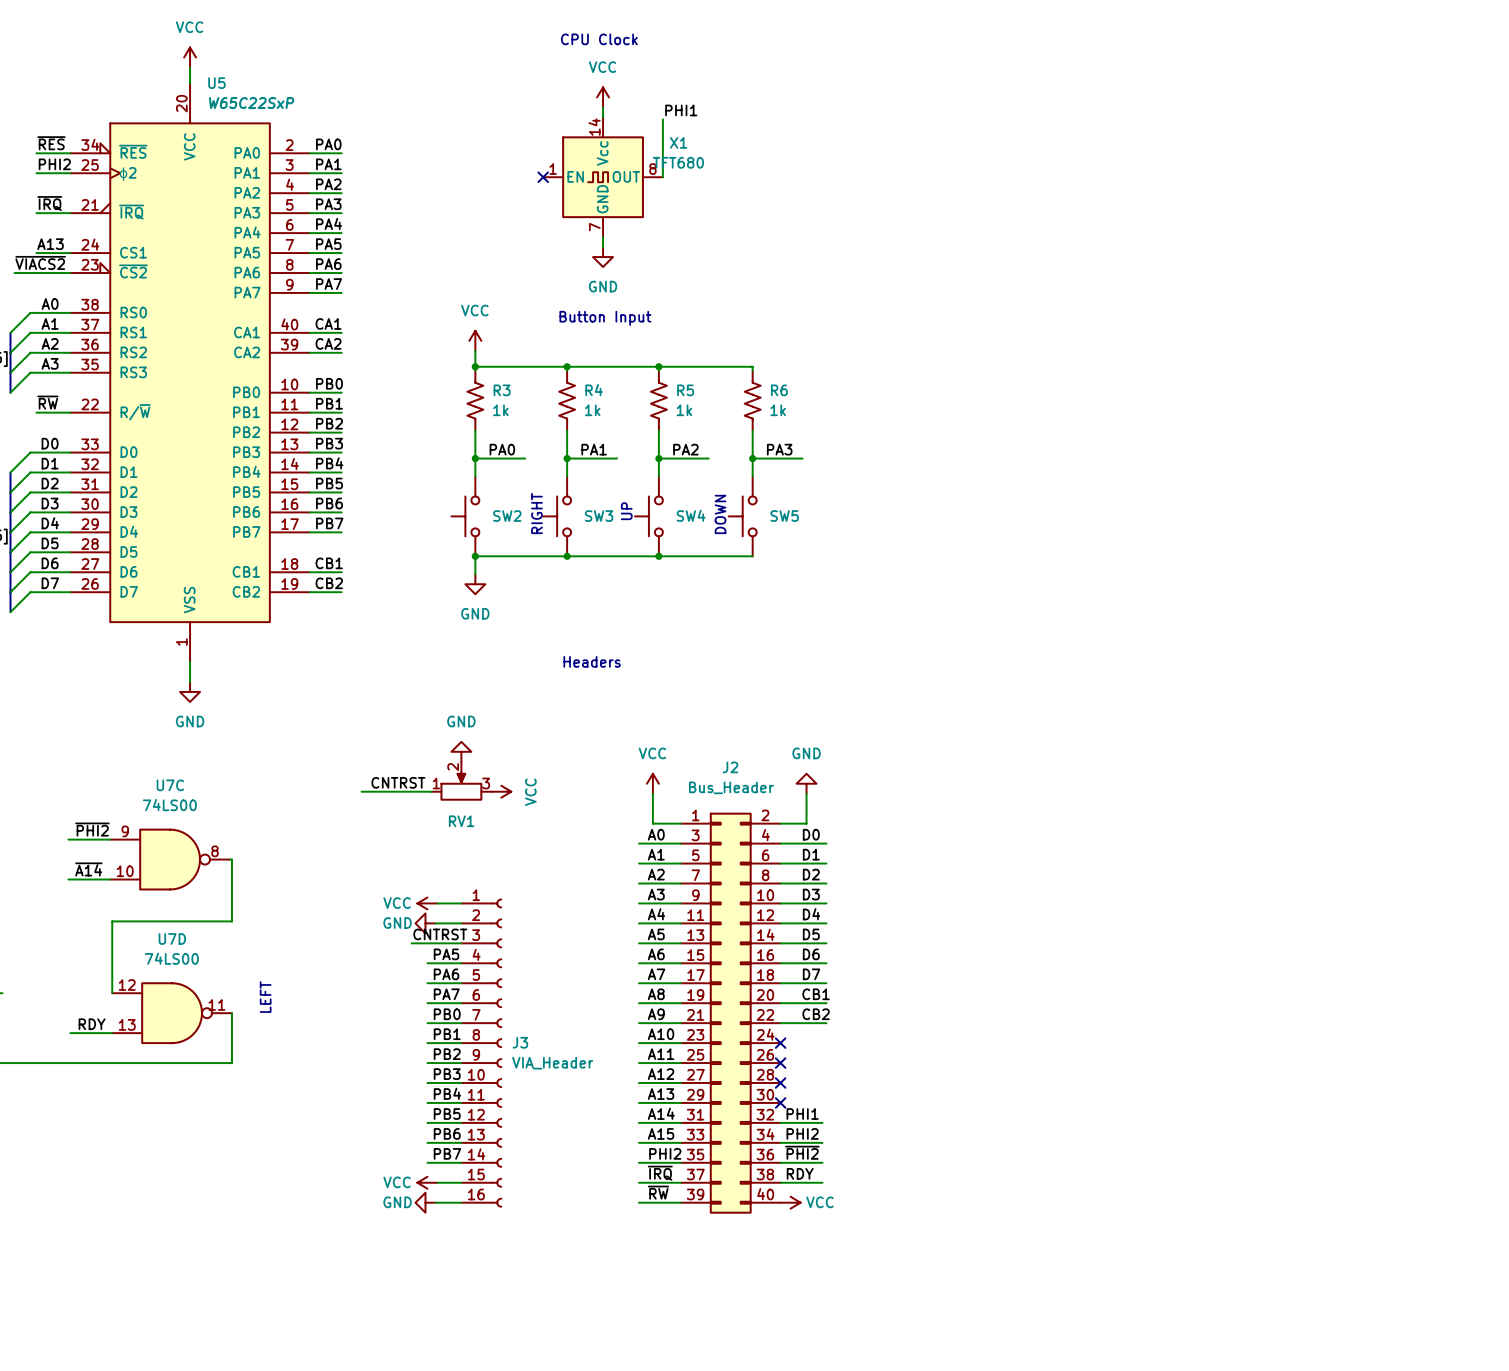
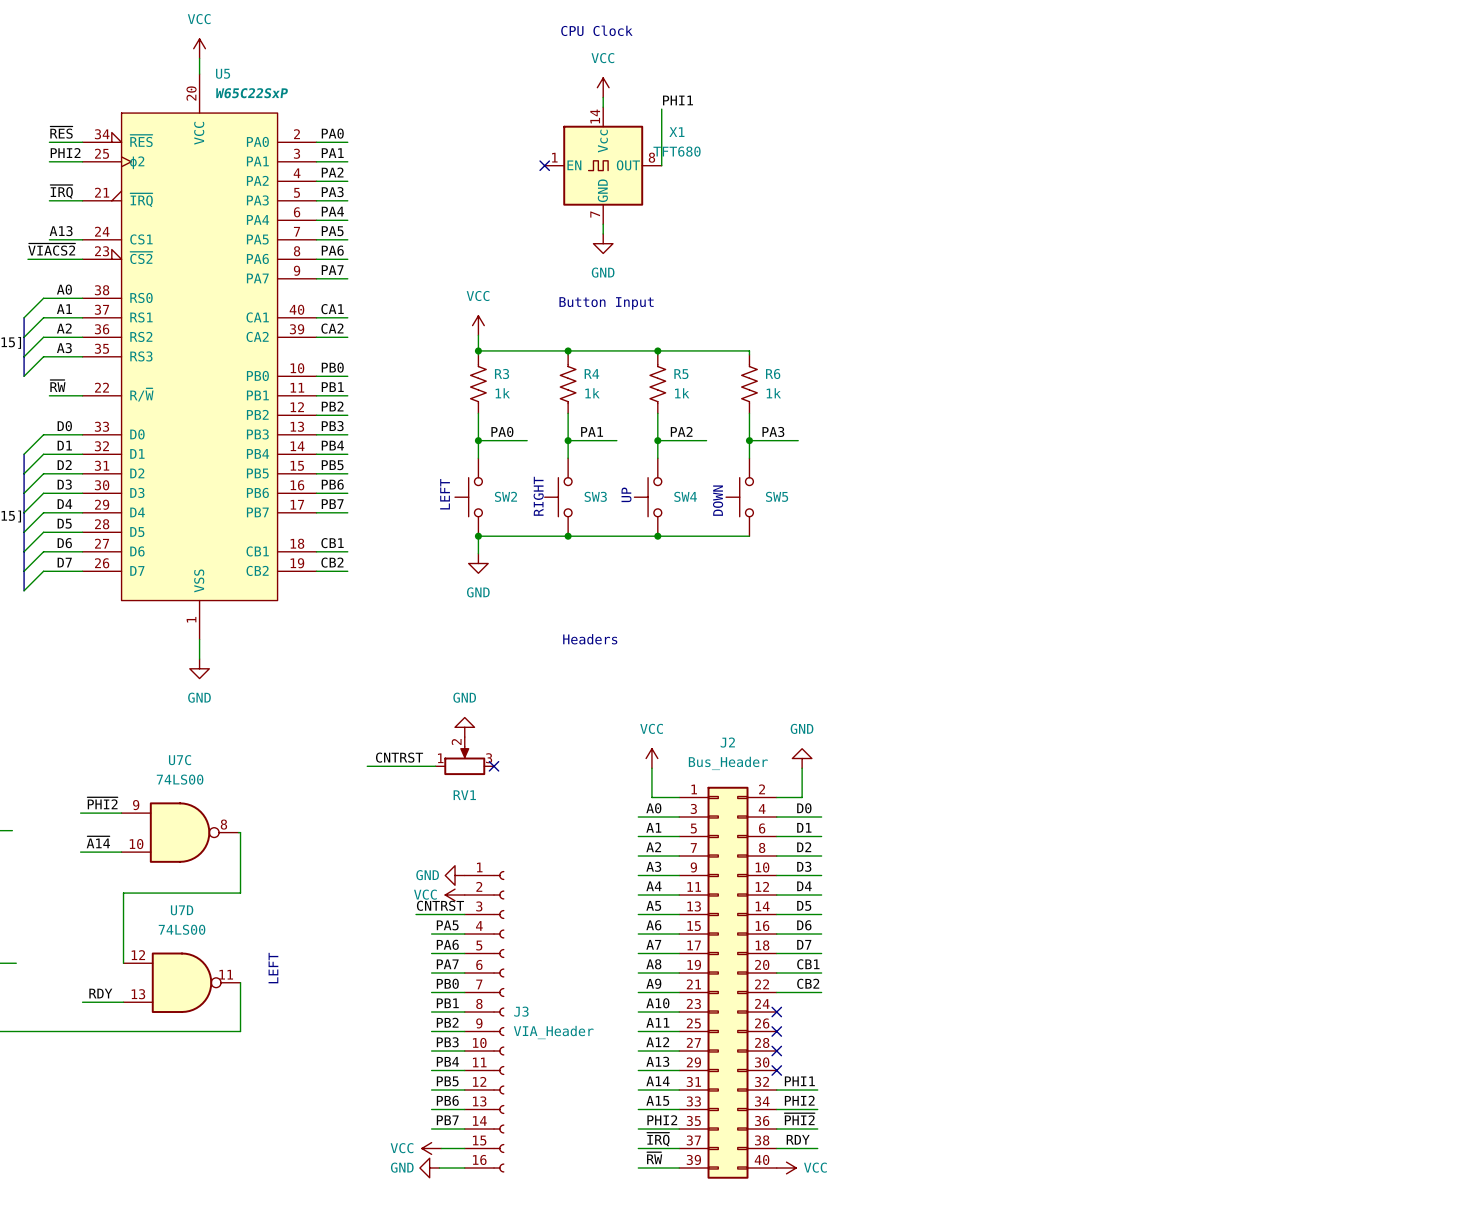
text: none -> LEFT (445, 494)
no-connect mark: none -> (494, 766)
power symbol: VCC (501, 791) -> none
power symbol position: VCC (427, 903) -> VCC (455, 895)
power symbol position: GND (425, 923) -> GND (455, 875)

